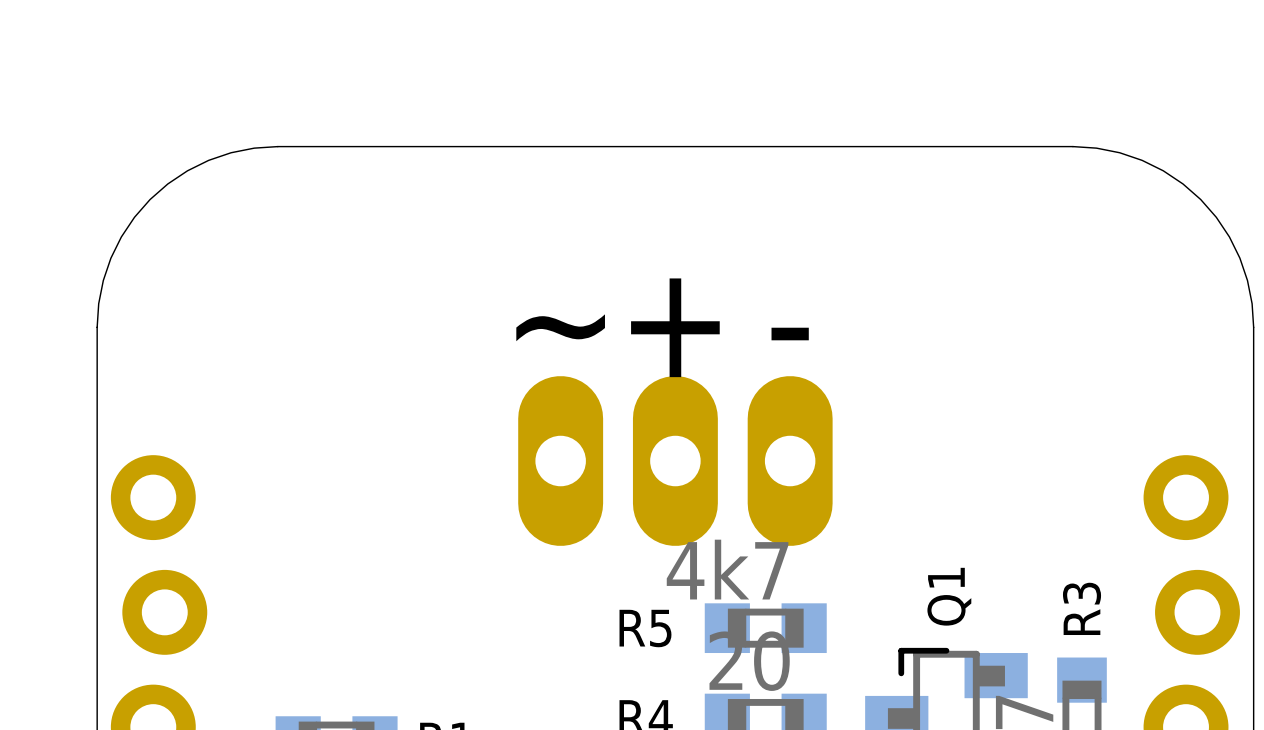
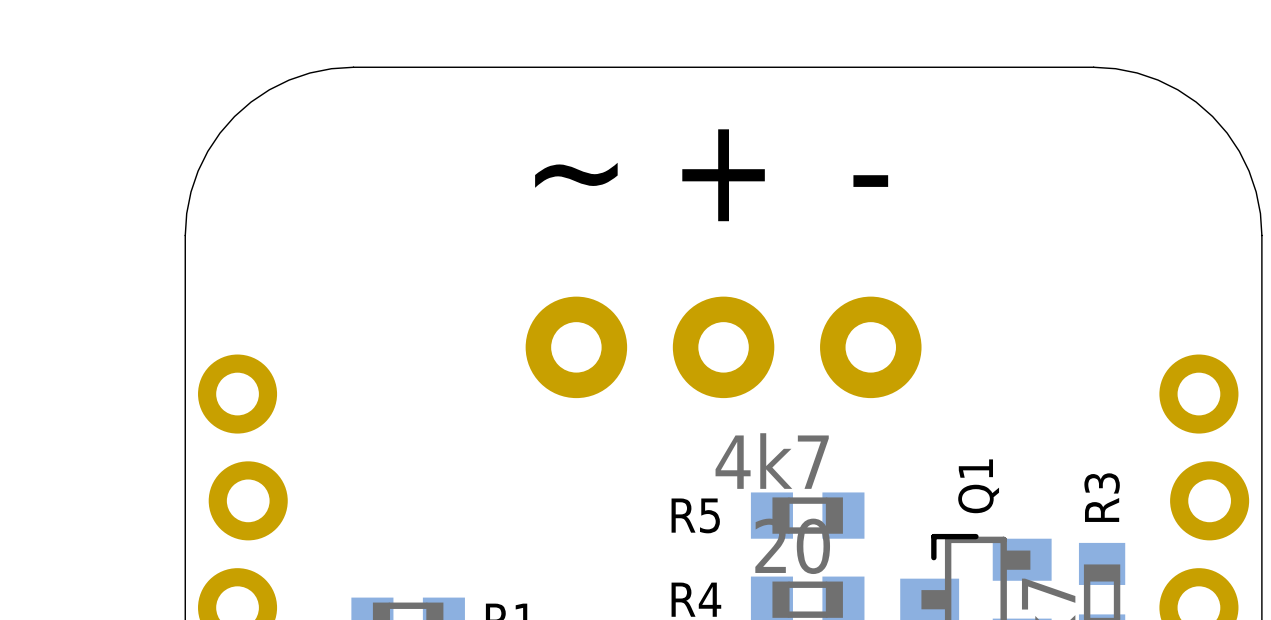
text position: ~ (560, 327) -> ~ (576, 175)
text position: + (675, 327) -> + (723, 175)
text position: - (790, 334) -> - (870, 181)
part footprint: [518, 376, 833, 546] -> [525, 296, 922, 399]

